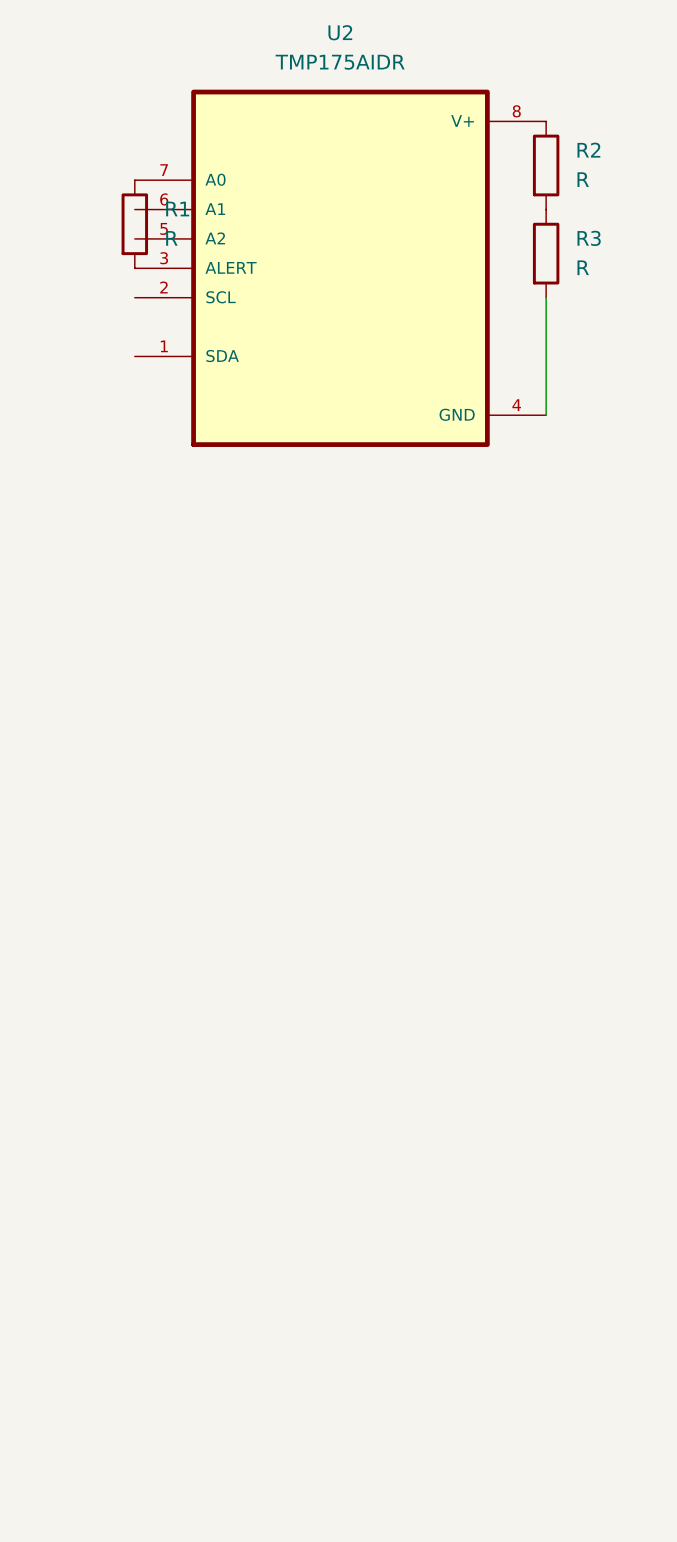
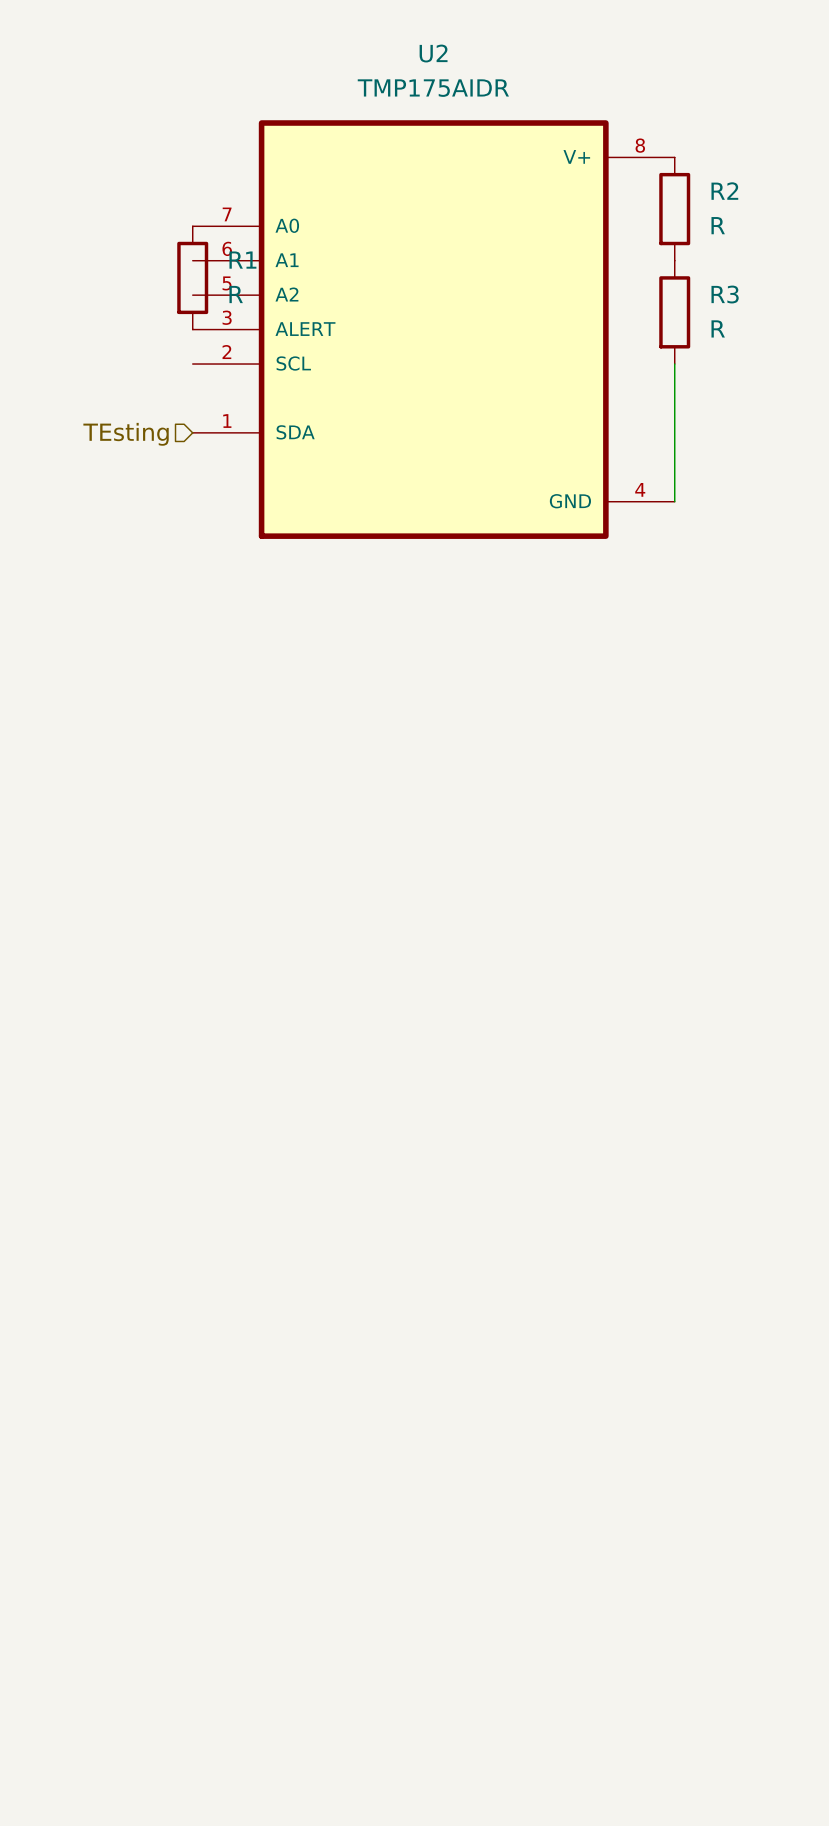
hierarchical label: none -> TEsting (126, 434)

